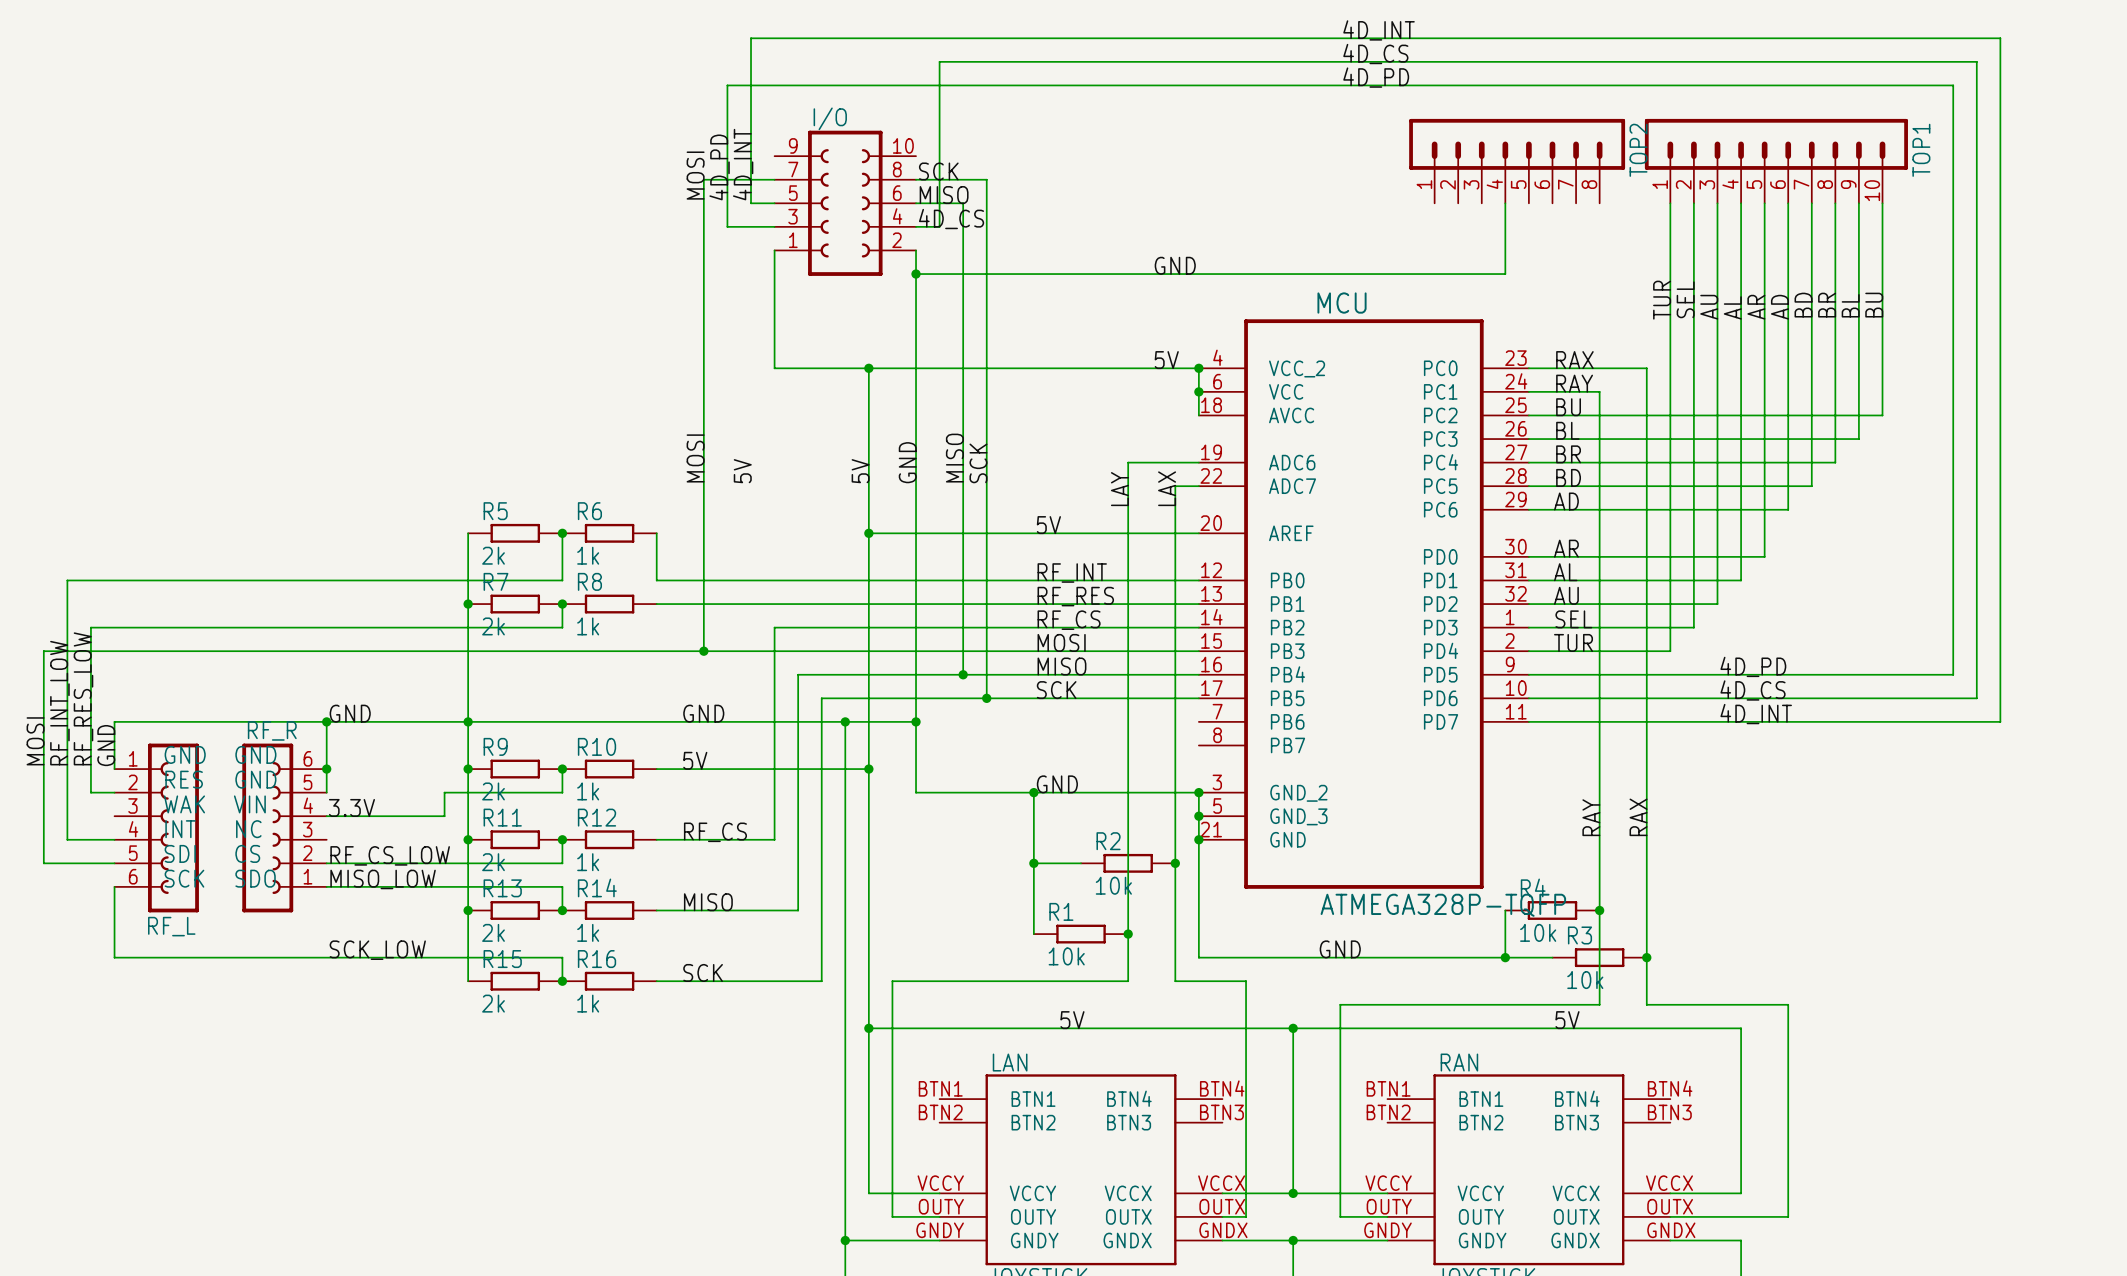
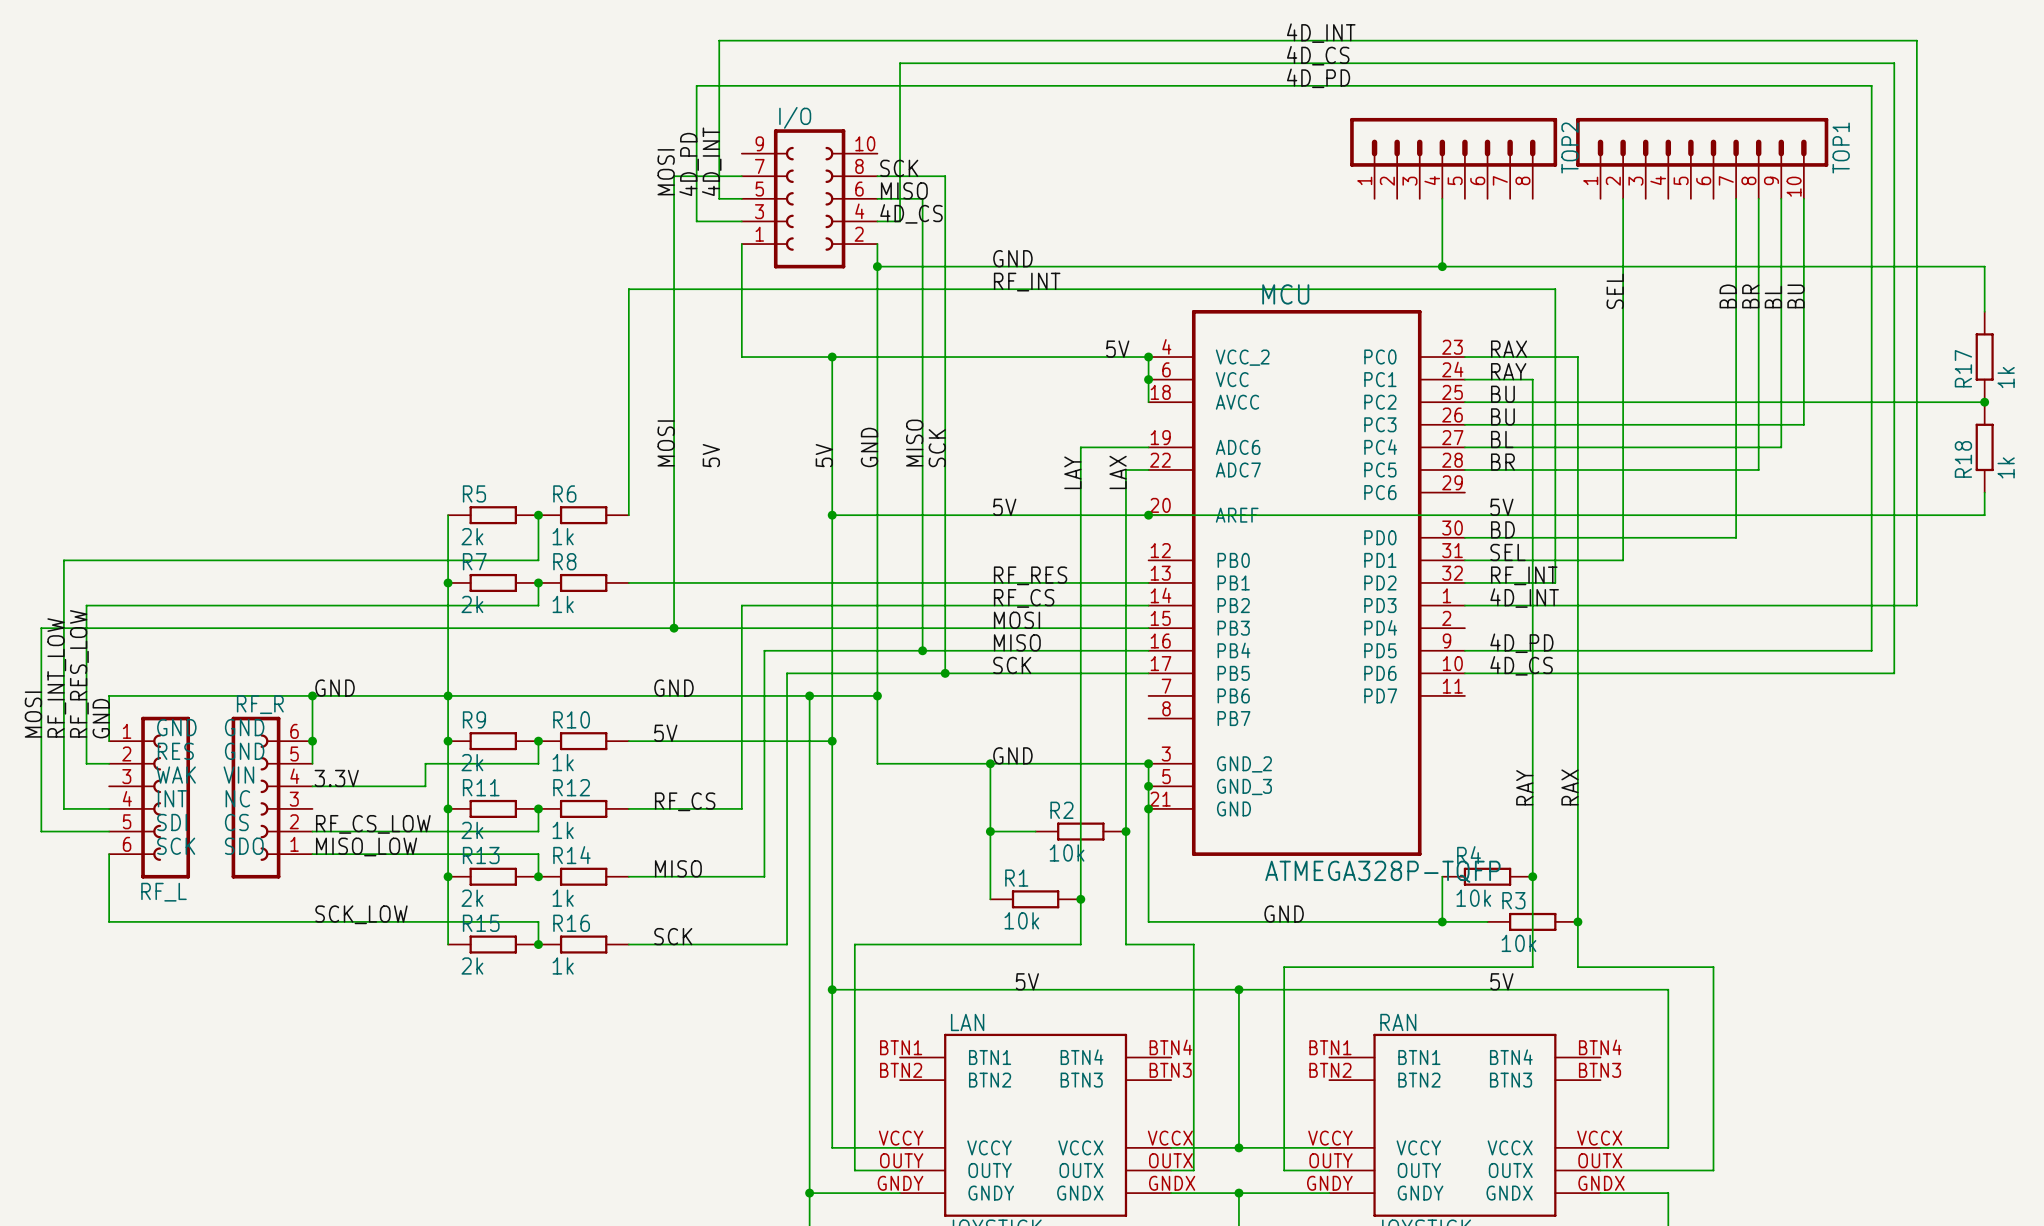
wire: (1670, 203) (1670, 651) (1528, 651) -> none
wire: (1717, 203) (1717, 604) (1623, 604) -> none
wire: (1741, 203) (1741, 580) (1693, 580) (1693, 627) -> none
wire: (1764, 203) (1764, 556) -> (1984, 402) (1803, 402) (1803, 424) (1781, 424) (1781, 447) (1758, 447) (1758, 469) (1736, 469) (1736, 537) (1690, 537)
wire: (1788, 203) (1788, 509) (1528, 509) -> none
label position: GND (1175, 265) -> GND (1012, 258)
wire: none -> (1442, 266) (1984, 266) (1984, 311)
junction: none -> (1442, 266)
label: none -> RF_INT (1027, 282)
label: TUR (1662, 300) -> none
label: AU (1709, 307) -> none
label: AL (1732, 307) -> none
label: AR (1756, 307) -> none
label: AD (1779, 307) -> none
R17: none -> 1k (1984, 357)
junction: none -> (1984, 402)
label: BL (1567, 430) -> BU (1502, 416)
label: BR (1568, 454) -> BL (1502, 439)
R18: none -> 1k (1984, 447)
label: BD (1568, 477) -> BR (1502, 462)
label: AD (1566, 501) -> none
wire: none -> (1984, 492) (1984, 515) (1148, 515)
label: none -> 5V (1501, 507)
wire: (656, 533) (656, 580) (1198, 580) -> (628, 515) (628, 289) (1555, 289) (1555, 582)
junction: none -> (1148, 515)
label: AR (1566, 548) -> BD (1502, 529)
label: AL (1565, 572) -> SEL (1508, 552)
label: RF_INT (1072, 573) -> none
label: AU (1566, 595) -> RF_INT (1524, 575)
label: SEL (1573, 619) -> 4D_INT (1524, 598)
wire: (2000, 627) (2000, 721) (1528, 721) -> (1916, 605) (1623, 605)
label: TUR (1573, 642) -> none
label position: 4D_PD (1753, 666) -> 4D_PD (1521, 643)
label position: 4D_CS (1753, 690) -> 4D_CS (1521, 665)
label: 4D_INT (1756, 714) -> none

